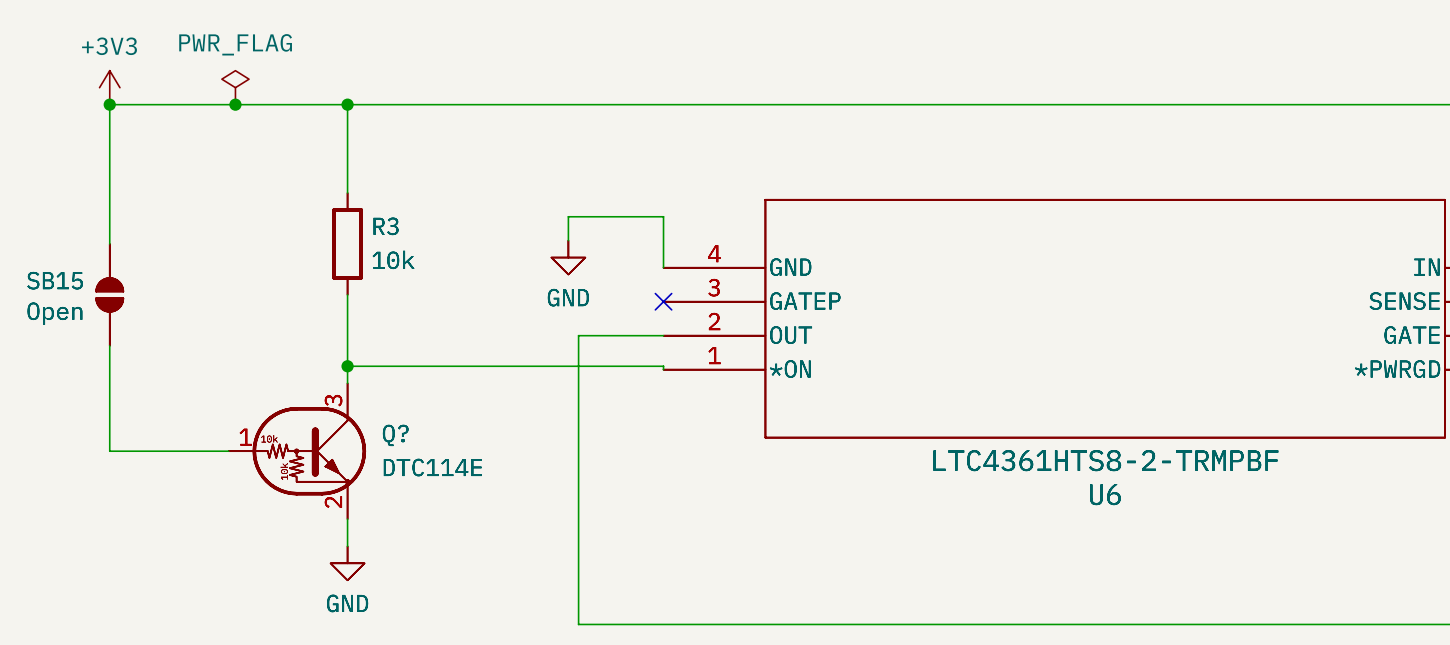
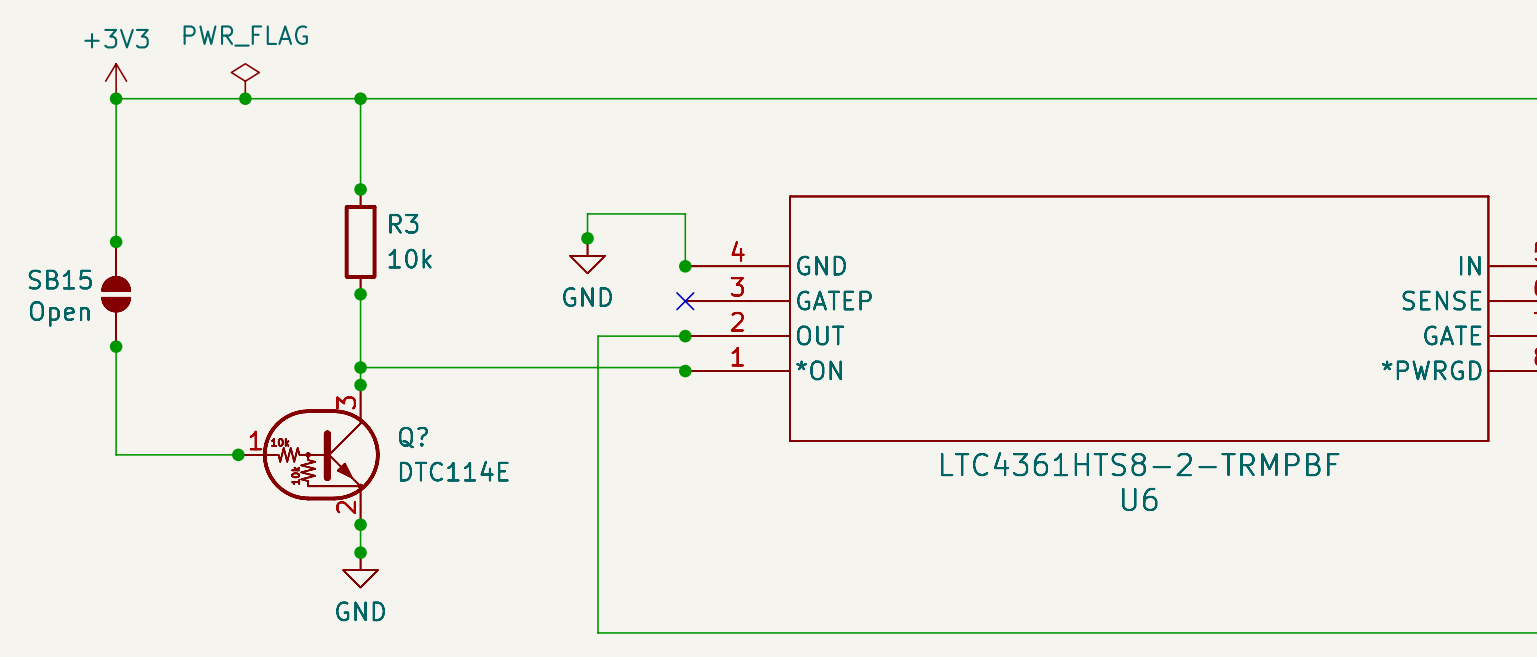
junction: none -> (360, 189)
junction: none -> (587, 238)
junction: none -> (116, 241)
junction: none -> (685, 266)
junction: none -> (360, 294)
junction: none -> (685, 336)
junction: none -> (116, 346)
junction: none -> (685, 371)
junction: none -> (360, 385)
junction: none -> (238, 454)
junction: none -> (360, 524)
junction: none -> (360, 552)

